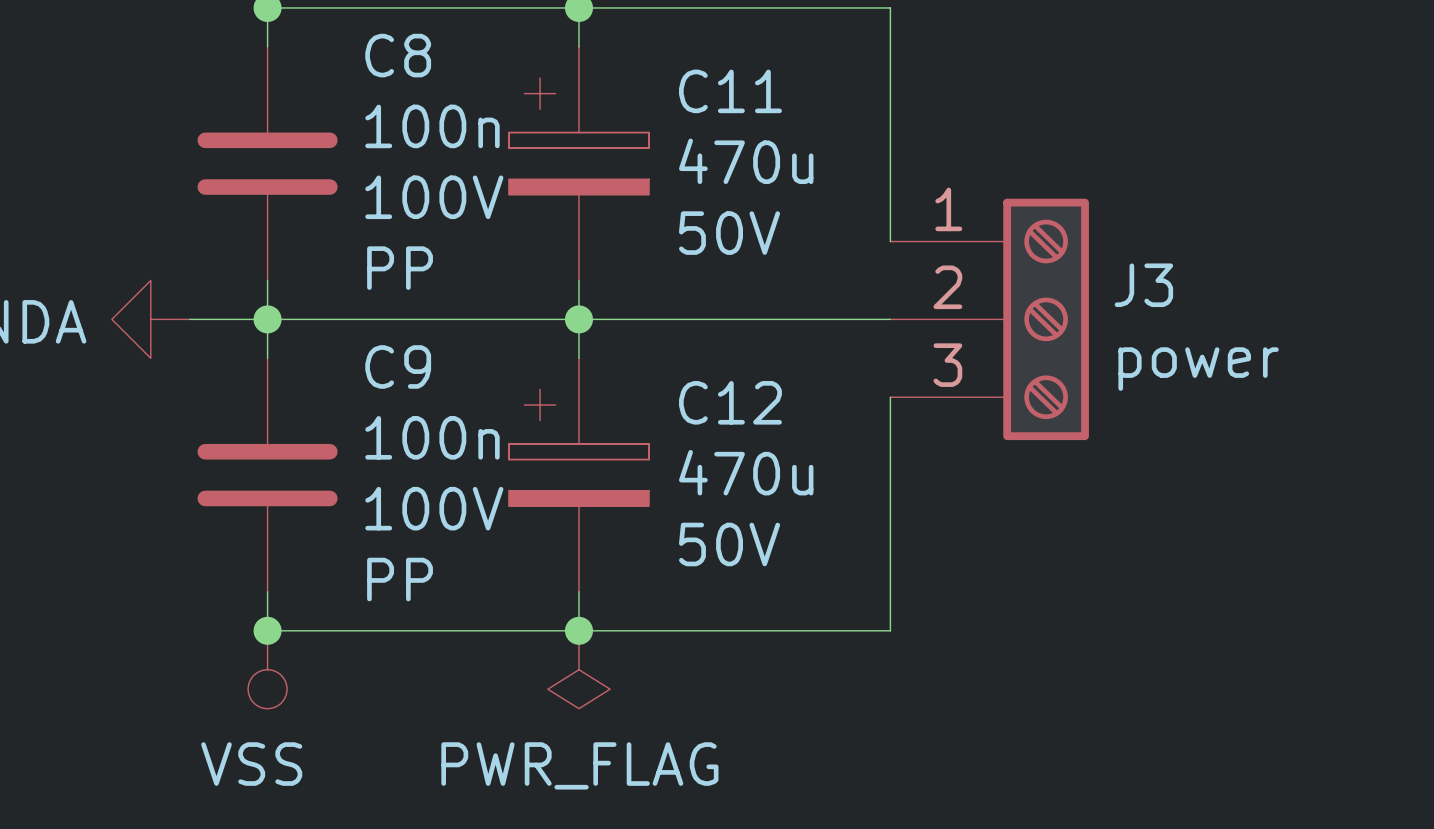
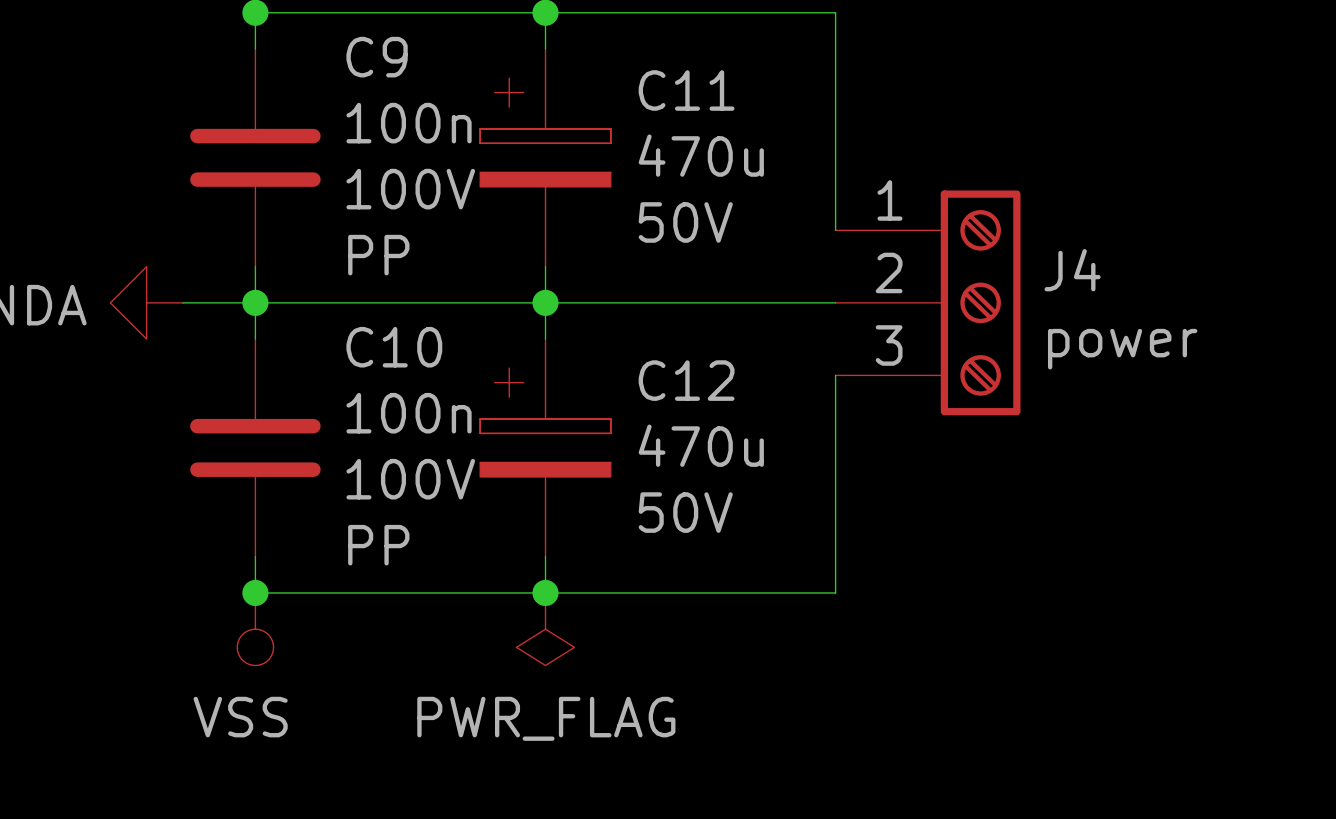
C8 name: C8 (398, 55) -> C9 (377, 57)
J3 name: J3 (1143, 285) -> J4 (1072, 270)
C9 name: C9 (398, 366) -> C10 (394, 347)

